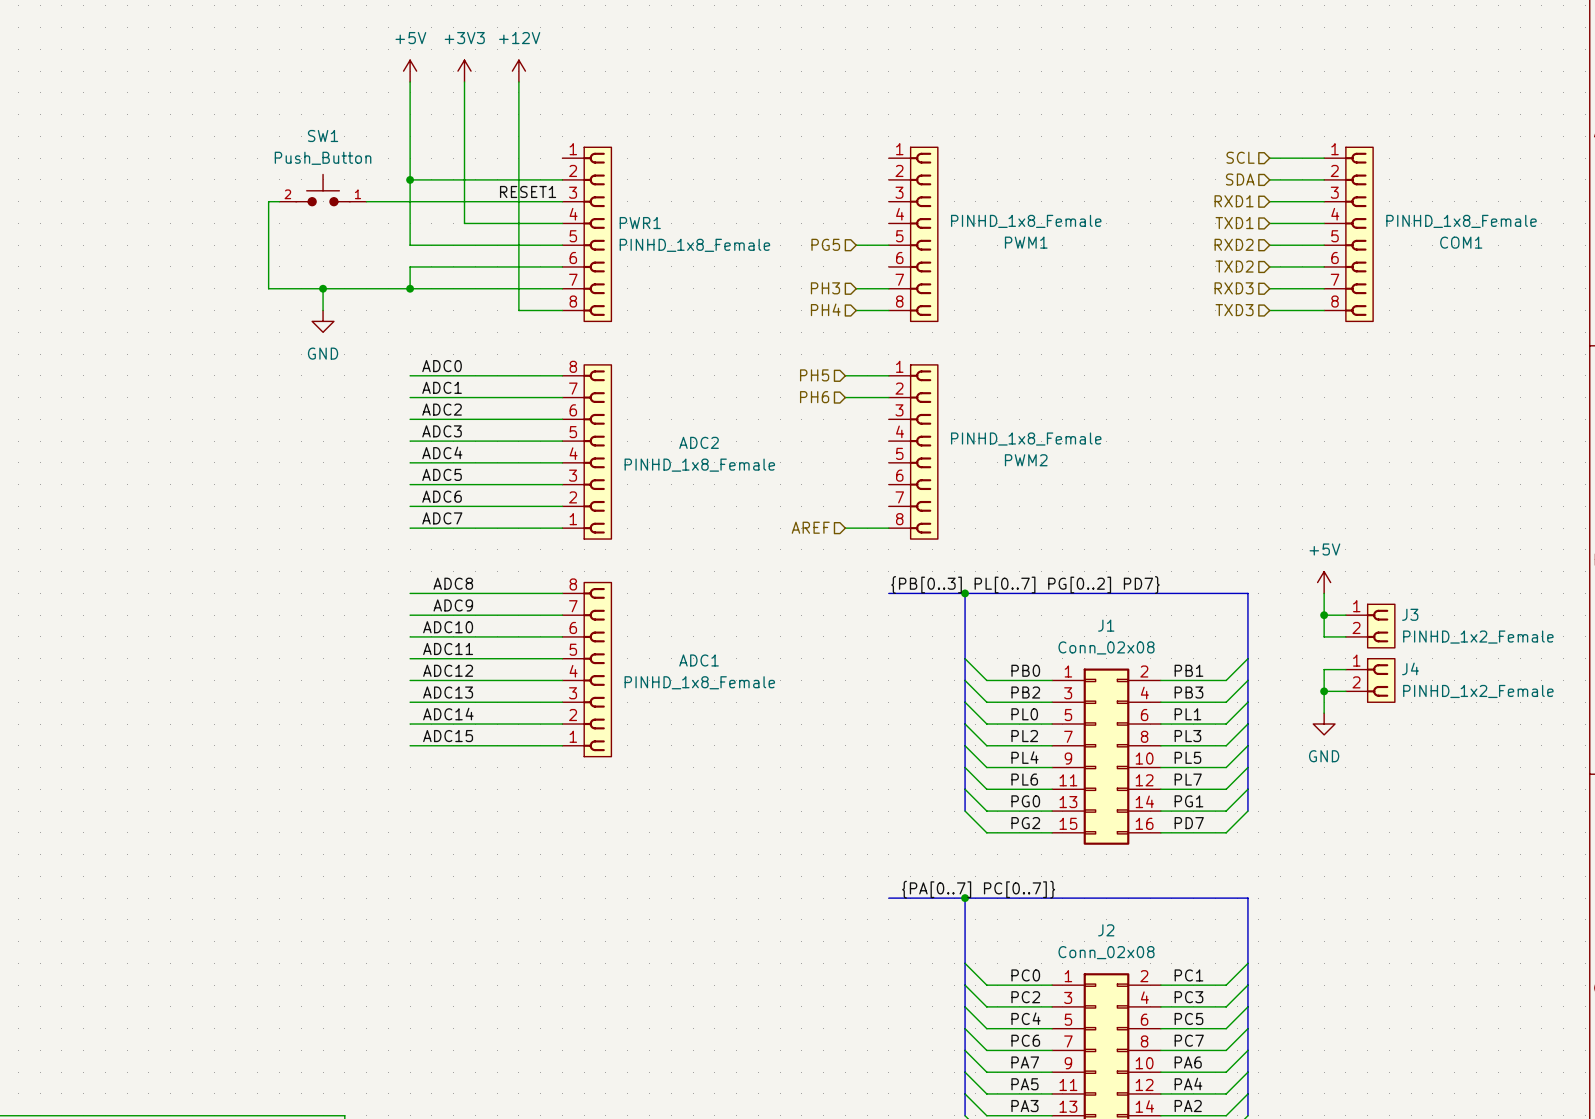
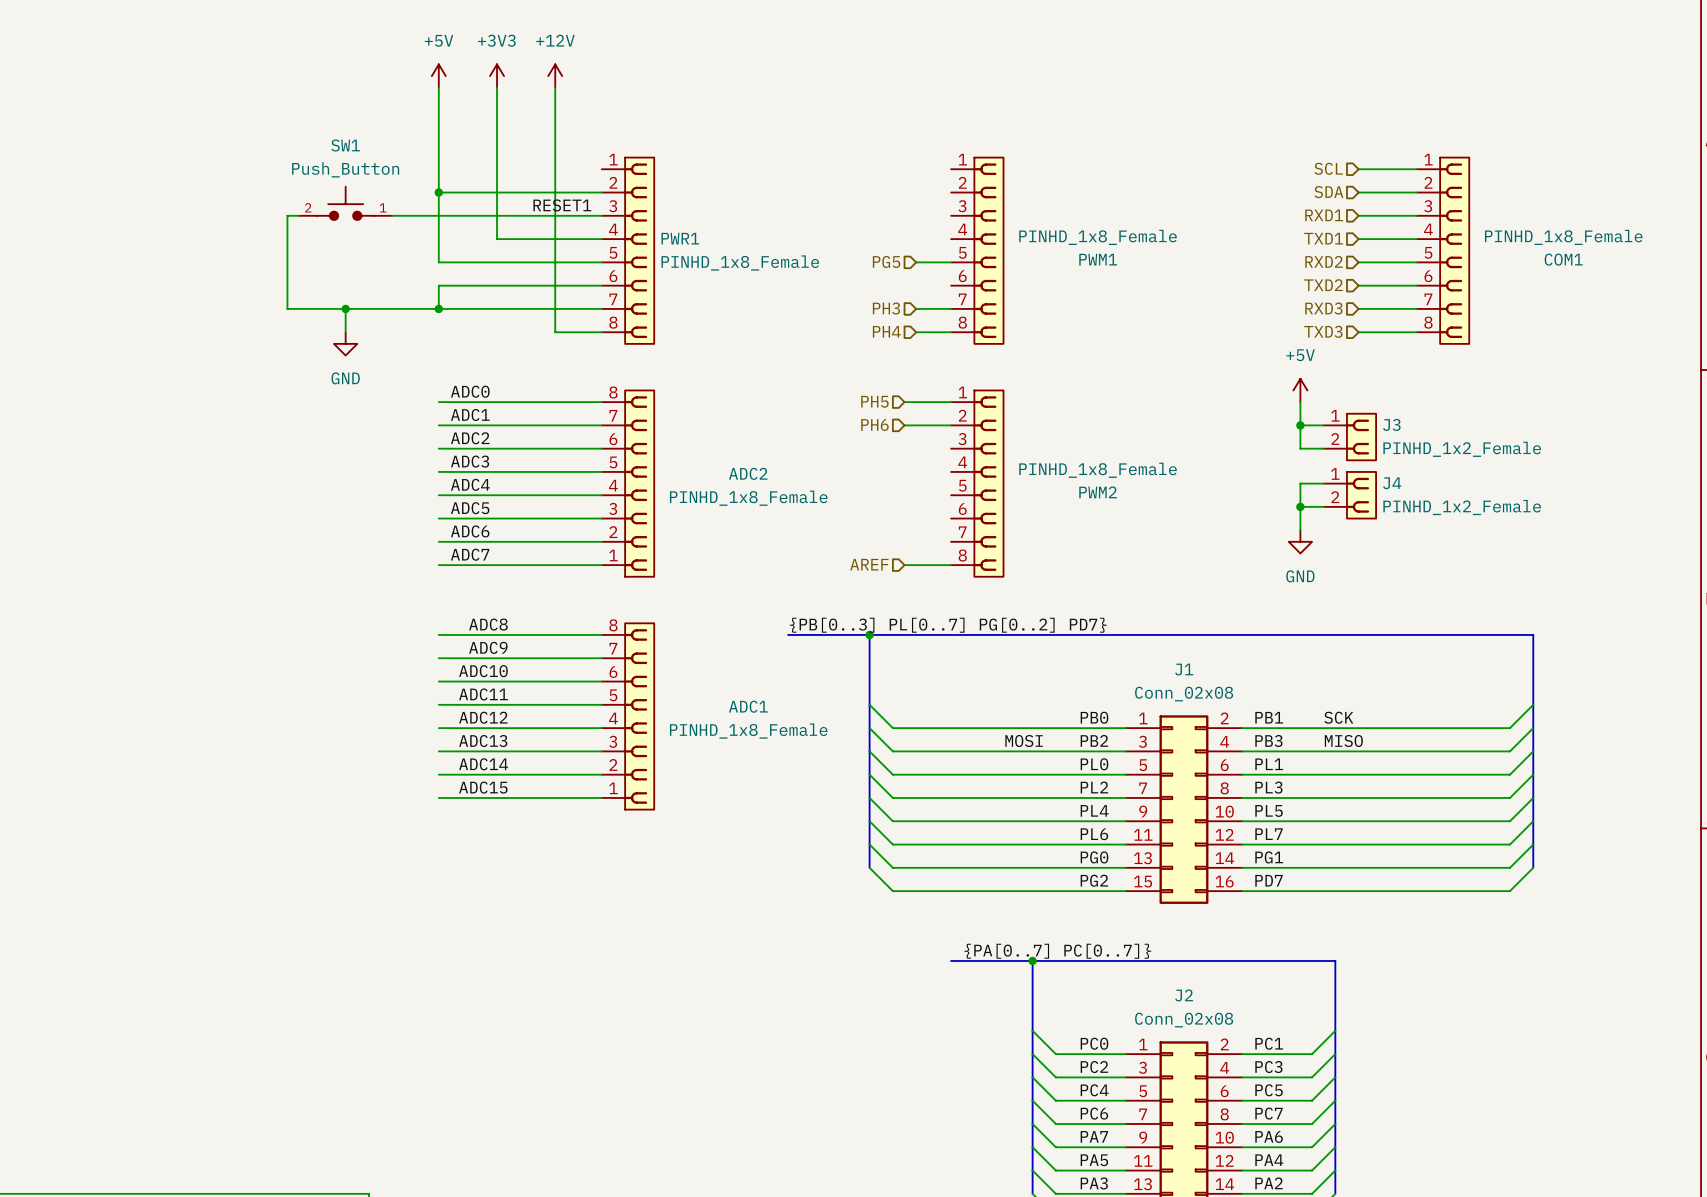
power symbol: none -> +5V (1300, 390)
wire: none -> (1300, 402) (1300, 448) (1323, 448)
wire: none -> (1300, 425) (1323, 425)
junction: none -> (1300, 425)
wire: none -> (1323, 483) (1300, 483) (1300, 530)
junction: none -> (1300, 506)
power symbol: none -> GND (1300, 541)
power symbol: +5V (1324, 582) -> none
label position: {PB[0..3] PL[0..7] PG[0..2] PD7} (1025, 585) -> {PB[0..3] PL[0..7] PG[0..2] PD7} (948, 625)
bus: none -> (788, 634) (951, 634)
junction: none -> (869, 634)
bus: (965, 593) (965, 811) -> (869, 634) (869, 867)
junction: (965, 593) -> none
bus: (1247, 593) (1247, 811) -> (1335, 634) (1533, 634) (1533, 867)
wire: (1324, 593) (1324, 636) (1345, 636) -> none
wire: (1324, 615) (1345, 615) -> (1300, 506) (1323, 506)
junction: (1324, 615) -> none
J3 position: (1370, 626) -> (1349, 437)
wire: (965, 658) (986, 680) -> (869, 704) (892, 728) (1055, 728)
wire: (1247, 658) (1226, 680) -> (1533, 704) (1509, 728) (1312, 728)
wire: (1345, 669) (1324, 669) (1324, 713) -> none
label: none -> SCK (1338, 717)
wire: (965, 680) (986, 702) -> (869, 728) (892, 751) (1055, 751)
wire: (1247, 680) (1226, 702) -> (1533, 728) (1509, 751) (1312, 751)
J4 position: (1370, 680) -> (1349, 495)
wire: (1324, 691) (1345, 691) -> none
junction: (1324, 691) -> none
label: none -> MOSI (1024, 741)
label: none -> MISO (1343, 741)
wire: (965, 702) (986, 724) -> (869, 751) (892, 774) (1055, 774)
wire: (1247, 702) (1226, 724) -> (1533, 751) (1509, 774) (1312, 774)
wire: (965, 724) (986, 745) -> (869, 774) (892, 797) (1055, 797)
wire: (1247, 724) (1226, 745) -> (1533, 774) (1509, 797) (1312, 797)
power symbol: GND (1324, 724) -> none
wire: (965, 745) (986, 767) -> (869, 797) (892, 821) (1055, 821)
wire: (1247, 745) (1226, 767) -> (1533, 797) (1509, 821) (1312, 821)
wire: (965, 767) (986, 789) -> (869, 821) (892, 844) (1055, 844)
wire: (1247, 767) (1226, 789) -> (1533, 821) (1509, 844) (1312, 844)
wire: (965, 789) (986, 811) -> (869, 844) (892, 867) (1055, 867)
wire: (1247, 789) (1226, 811) -> (1533, 844) (1509, 867) (1312, 867)
wire: (965, 811) (986, 832) -> (869, 867) (892, 891) (1055, 891)
wire: (1247, 811) (1226, 832) -> (1533, 867) (1509, 891) (1312, 891)

